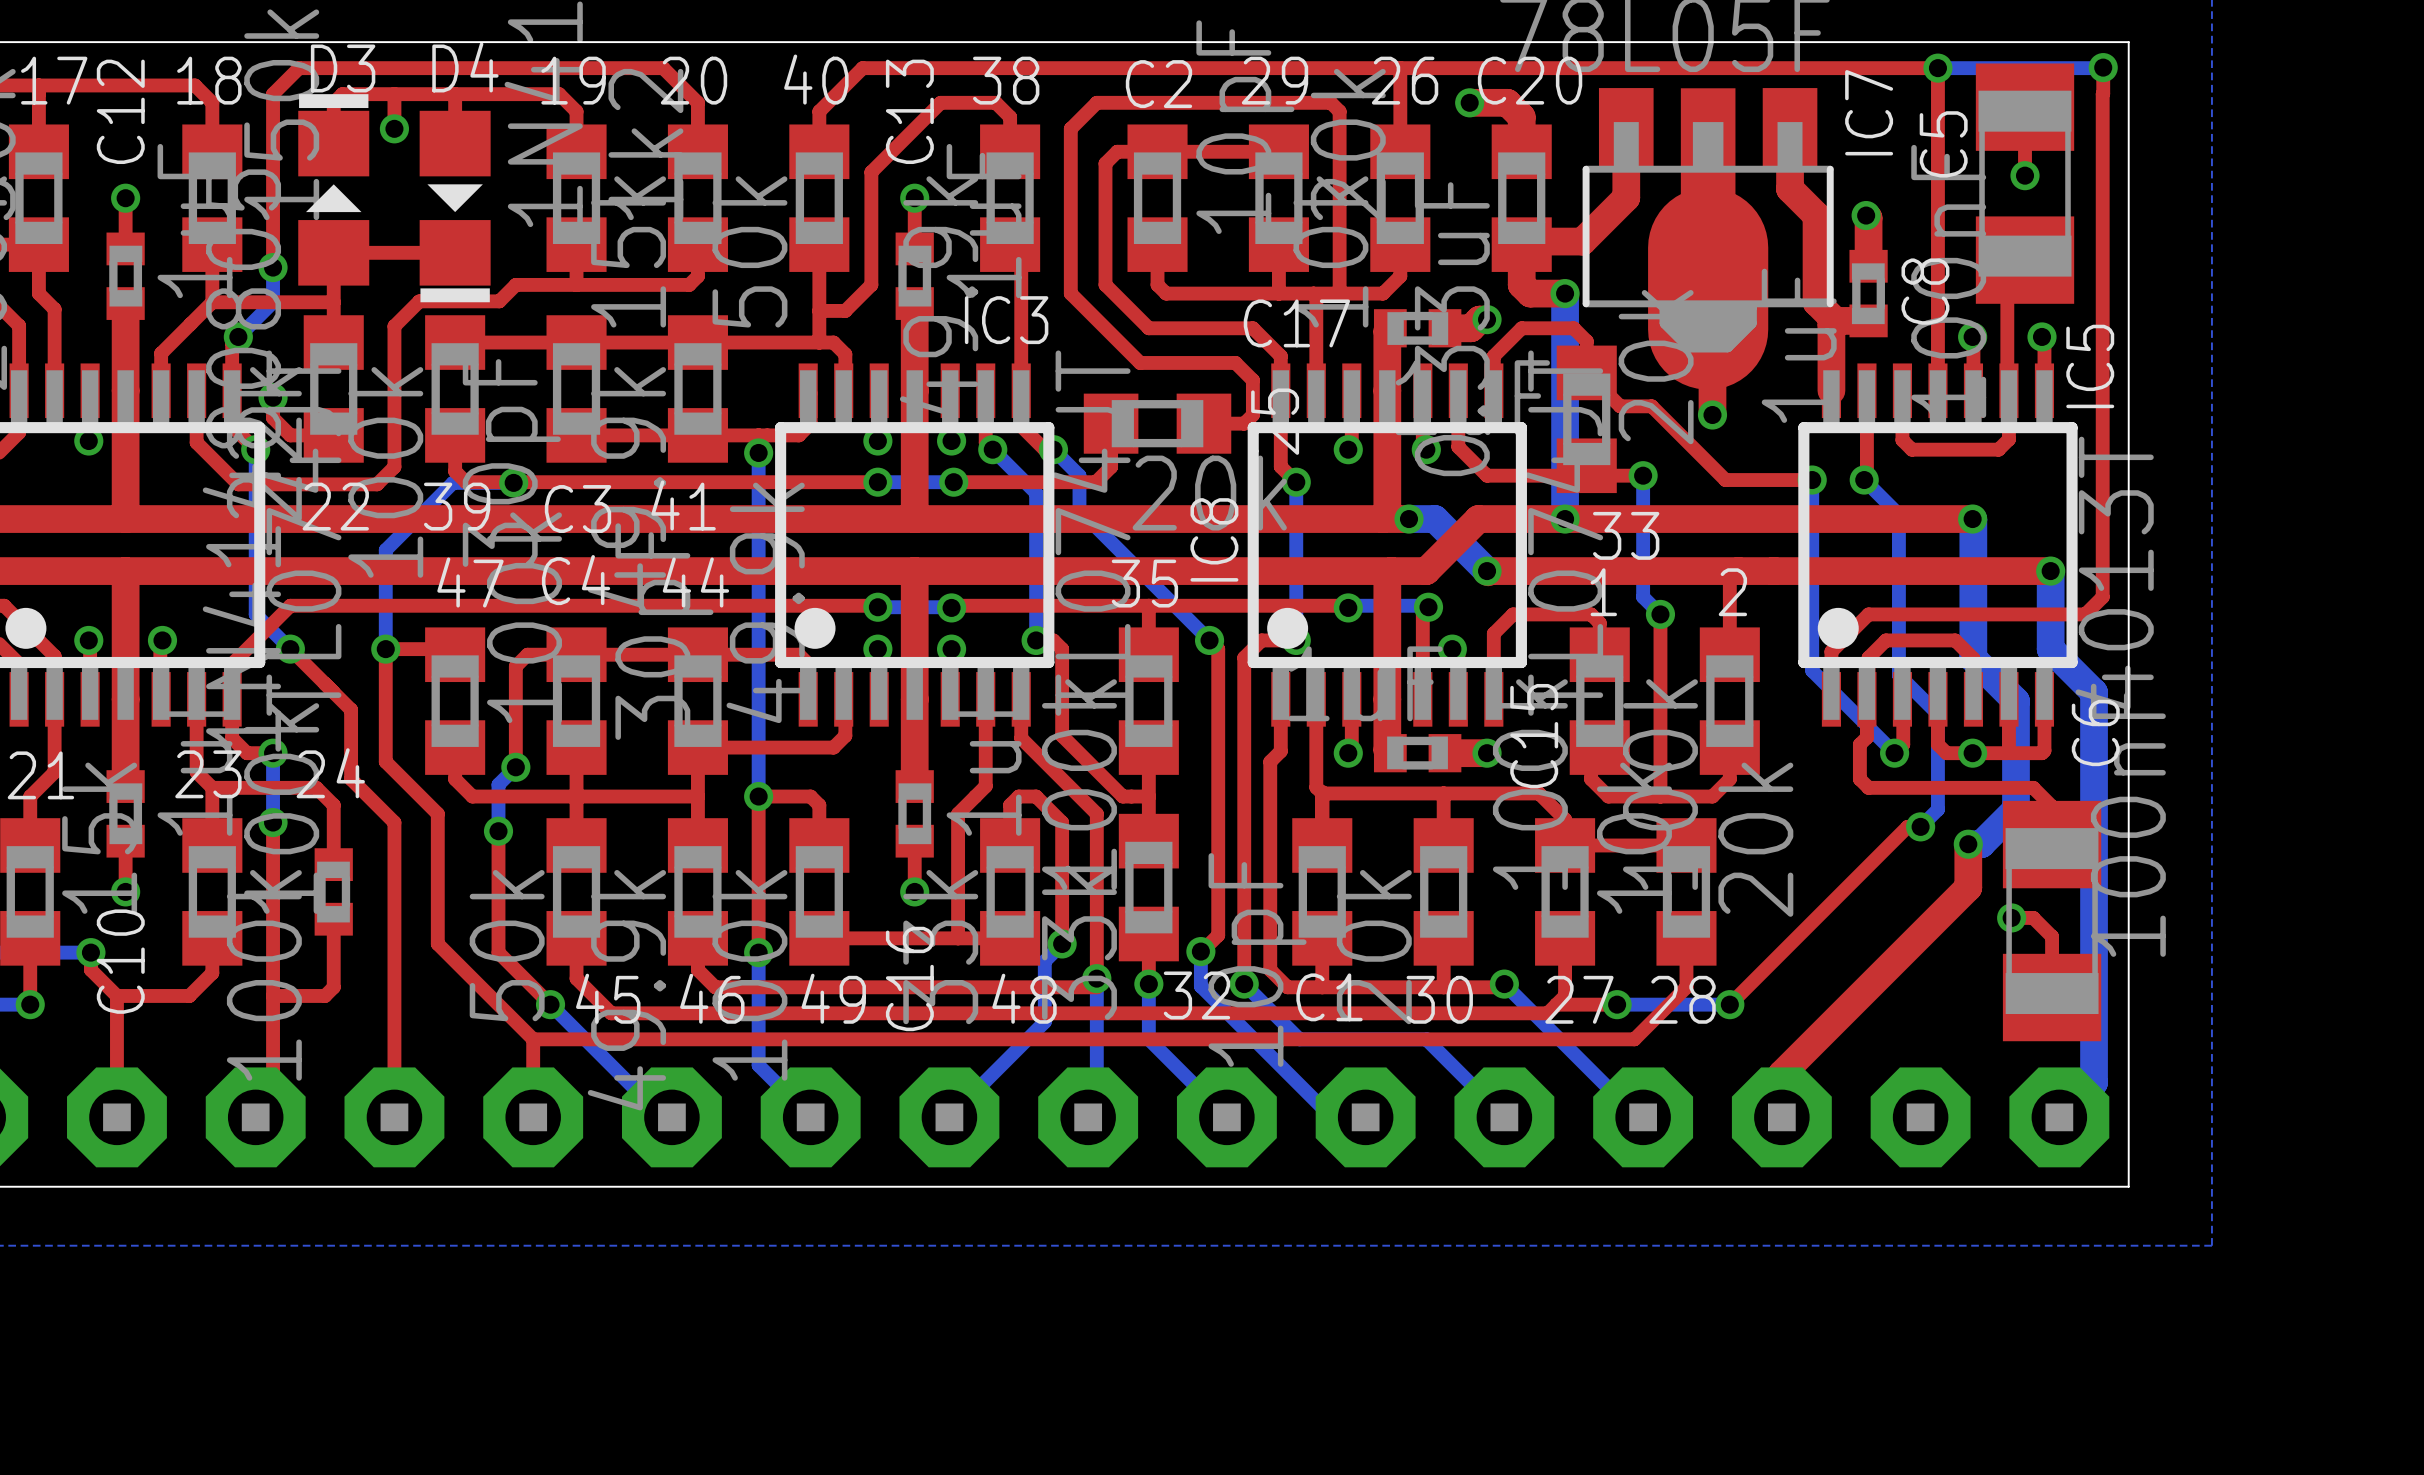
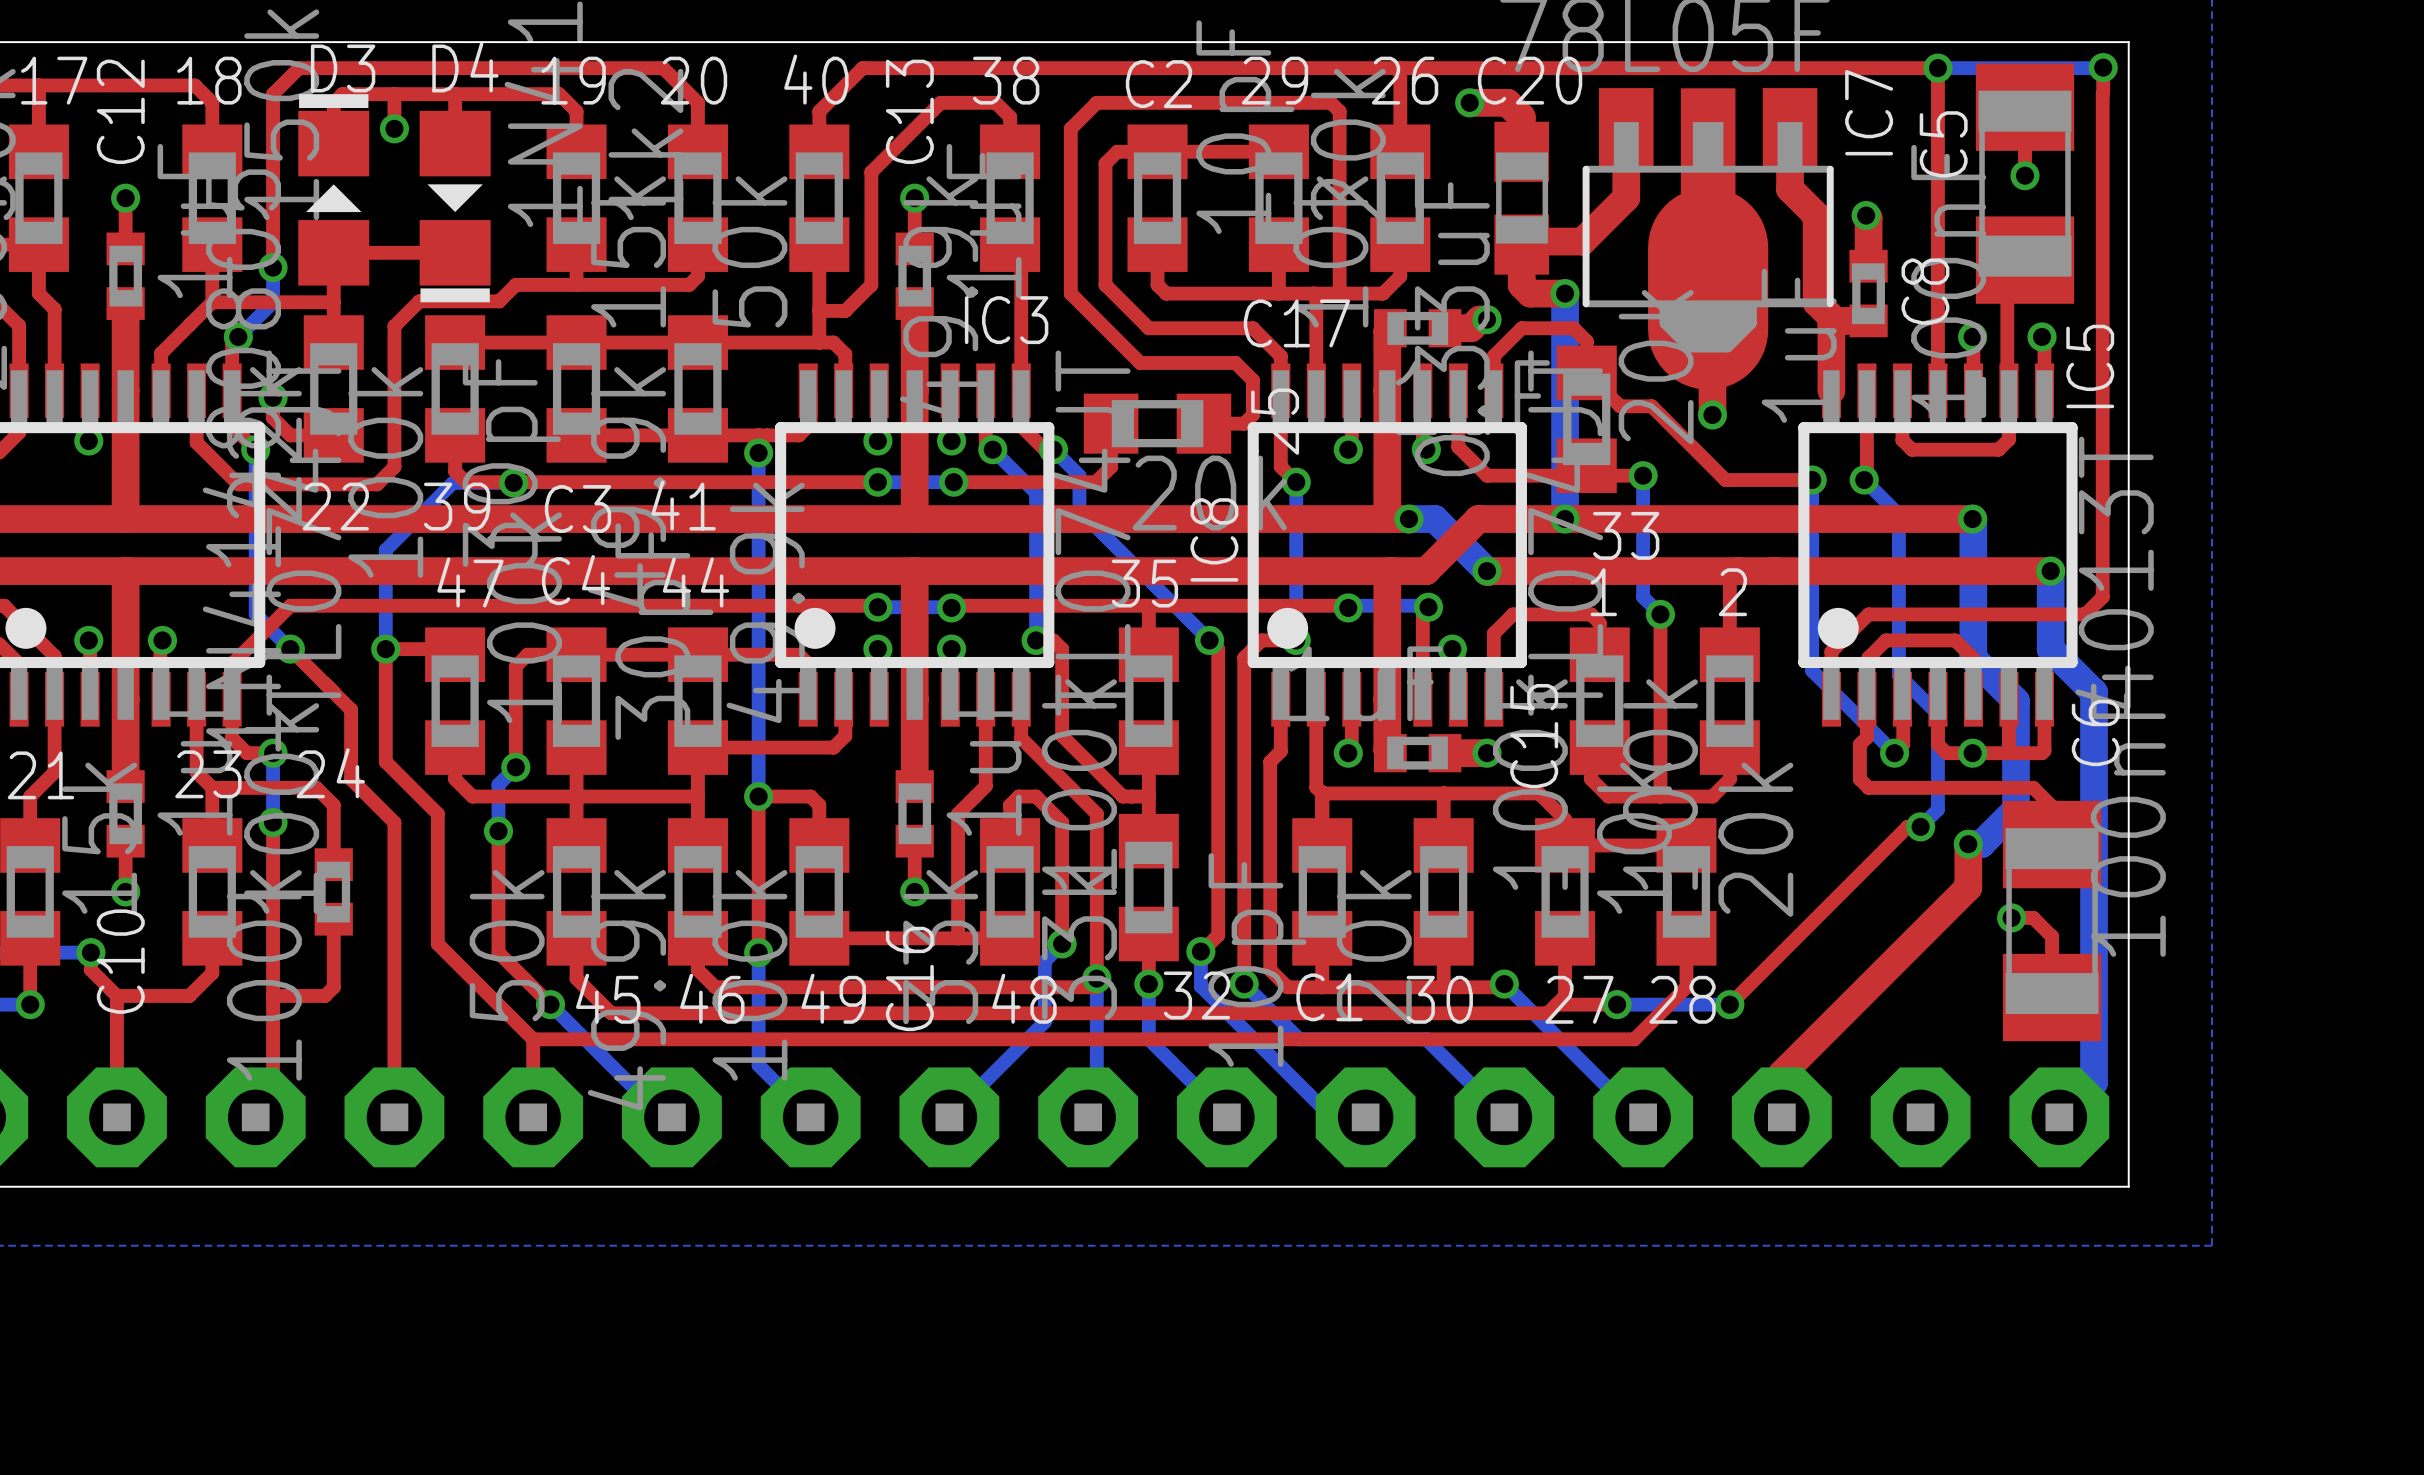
C20 footprint: [1491, 124, 1552, 272] -> [1494, 121, 1550, 275]

